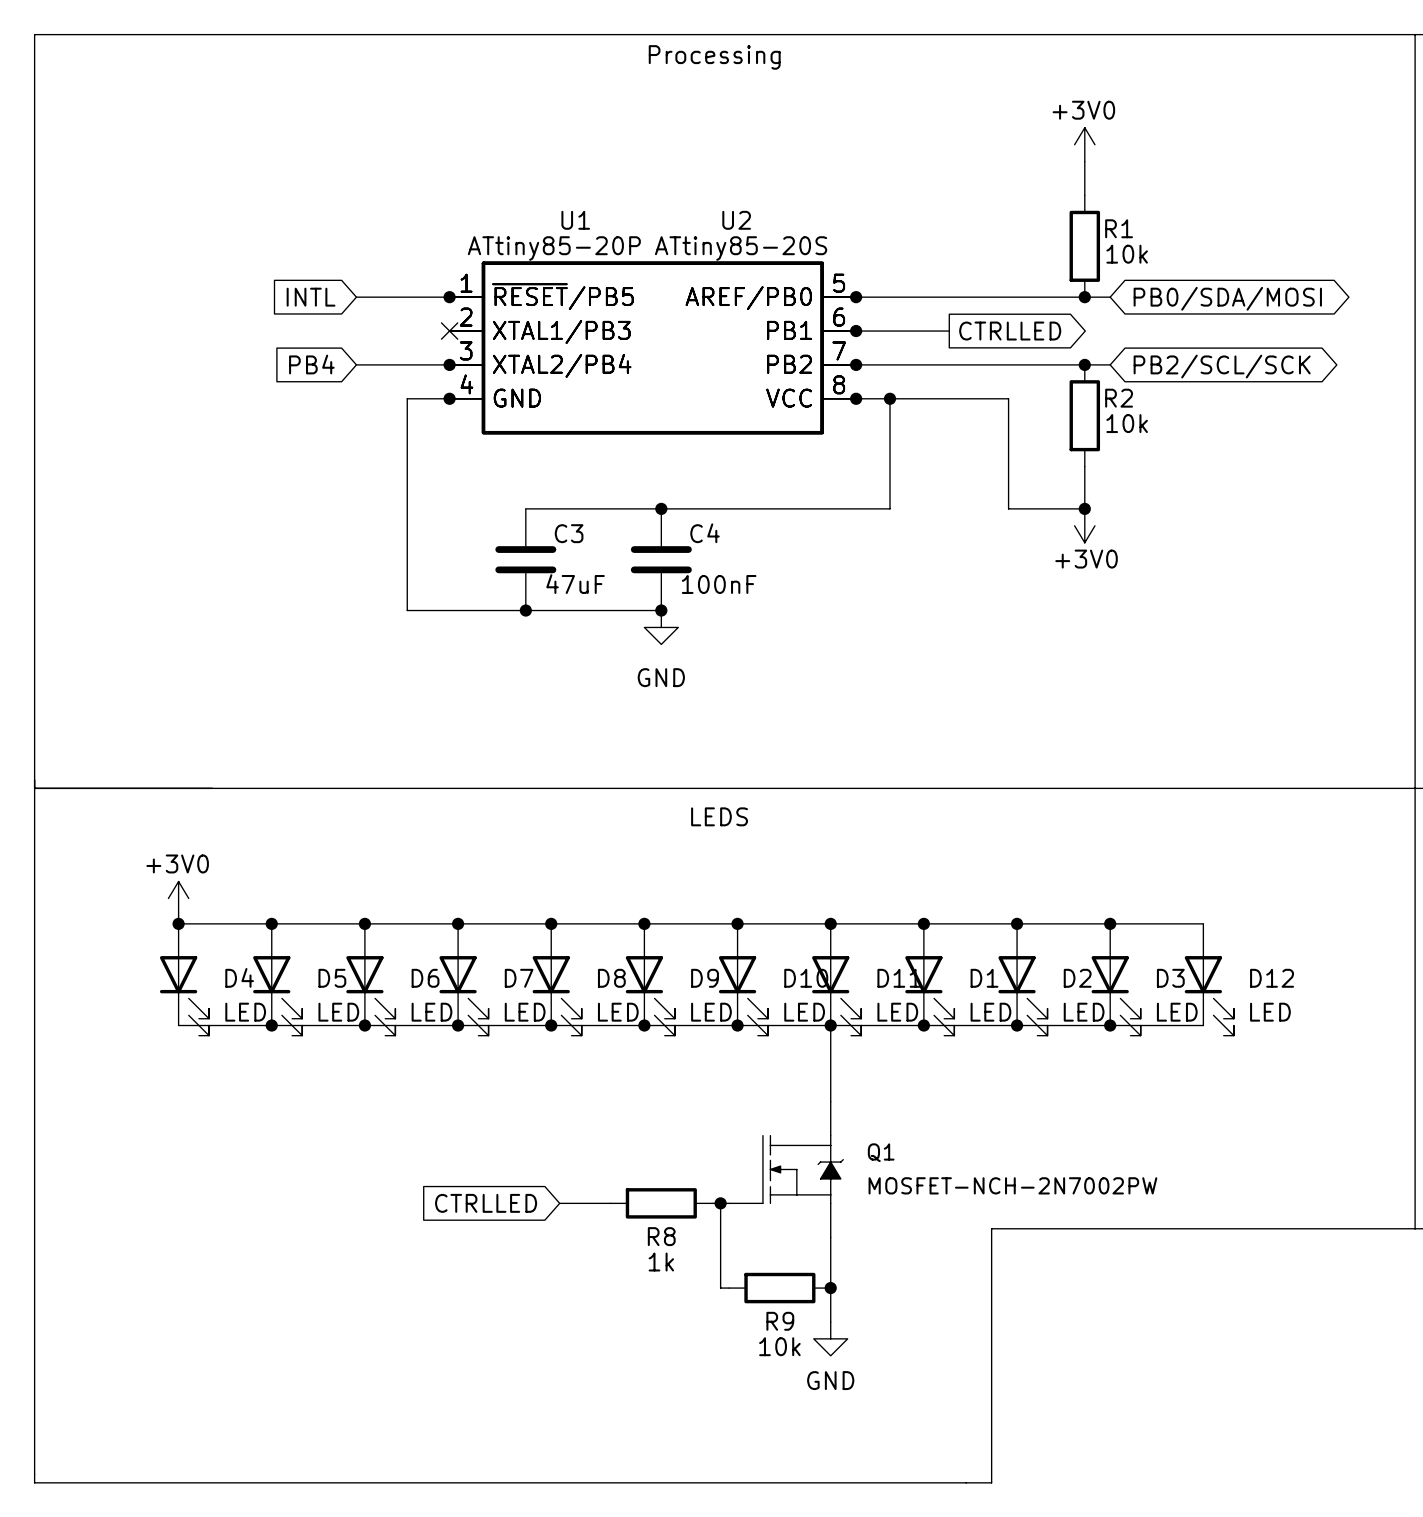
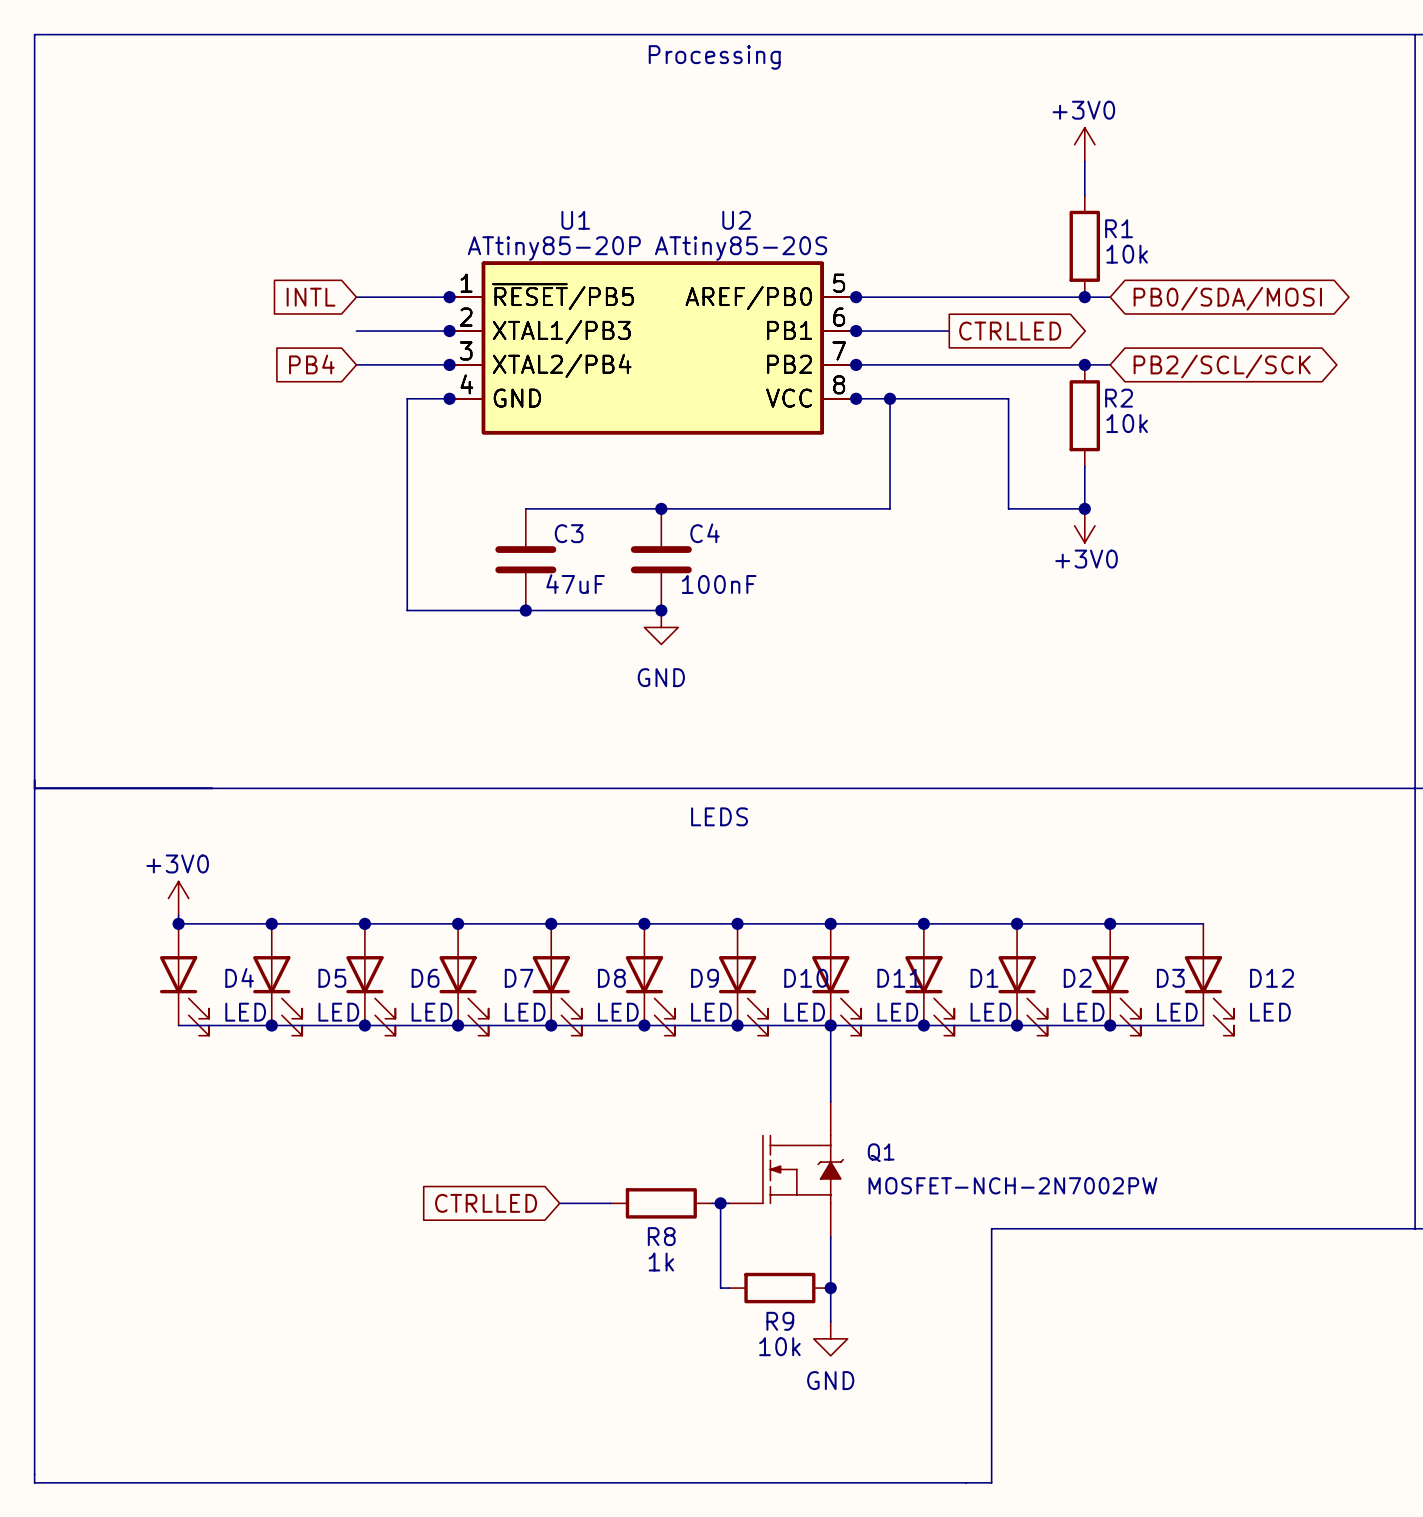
wire: none -> (356, 331) (449, 331)
no-connect mark: (449, 331) -> none
junction: none -> (449, 331)

